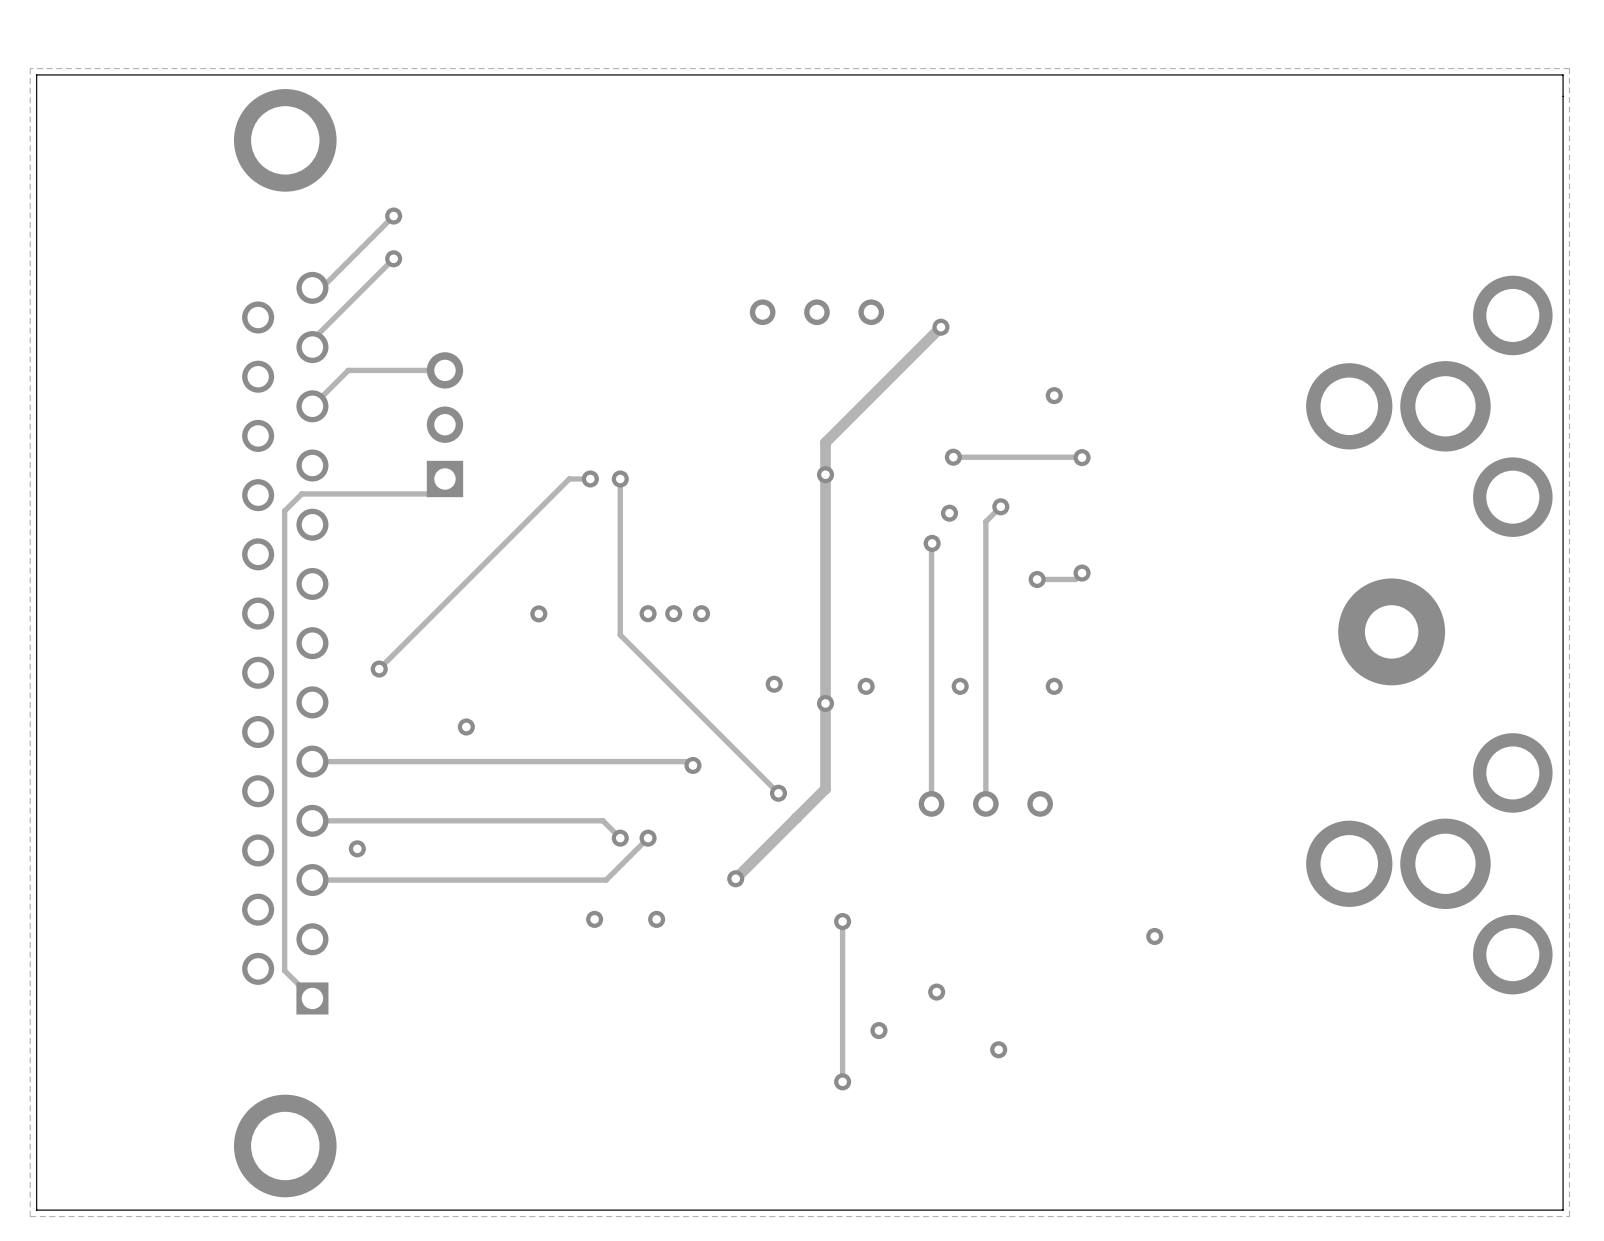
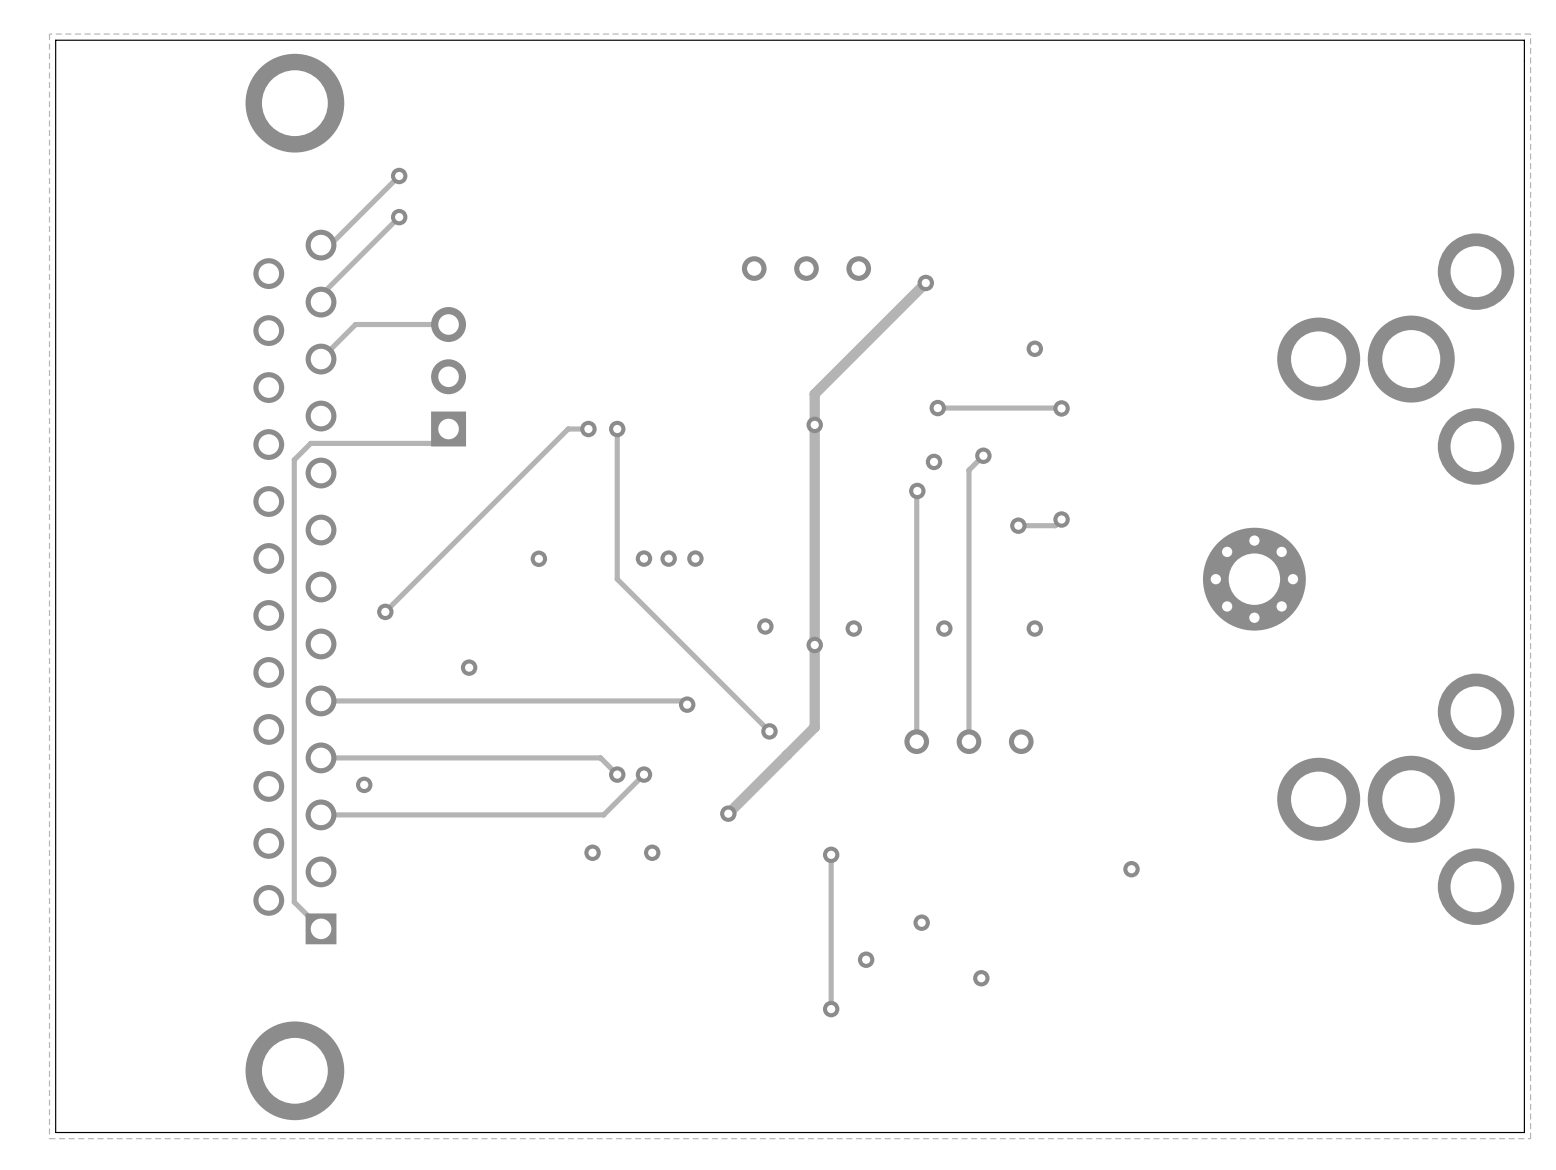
part: (1391, 631) -> none
part: none -> (1254, 579)

